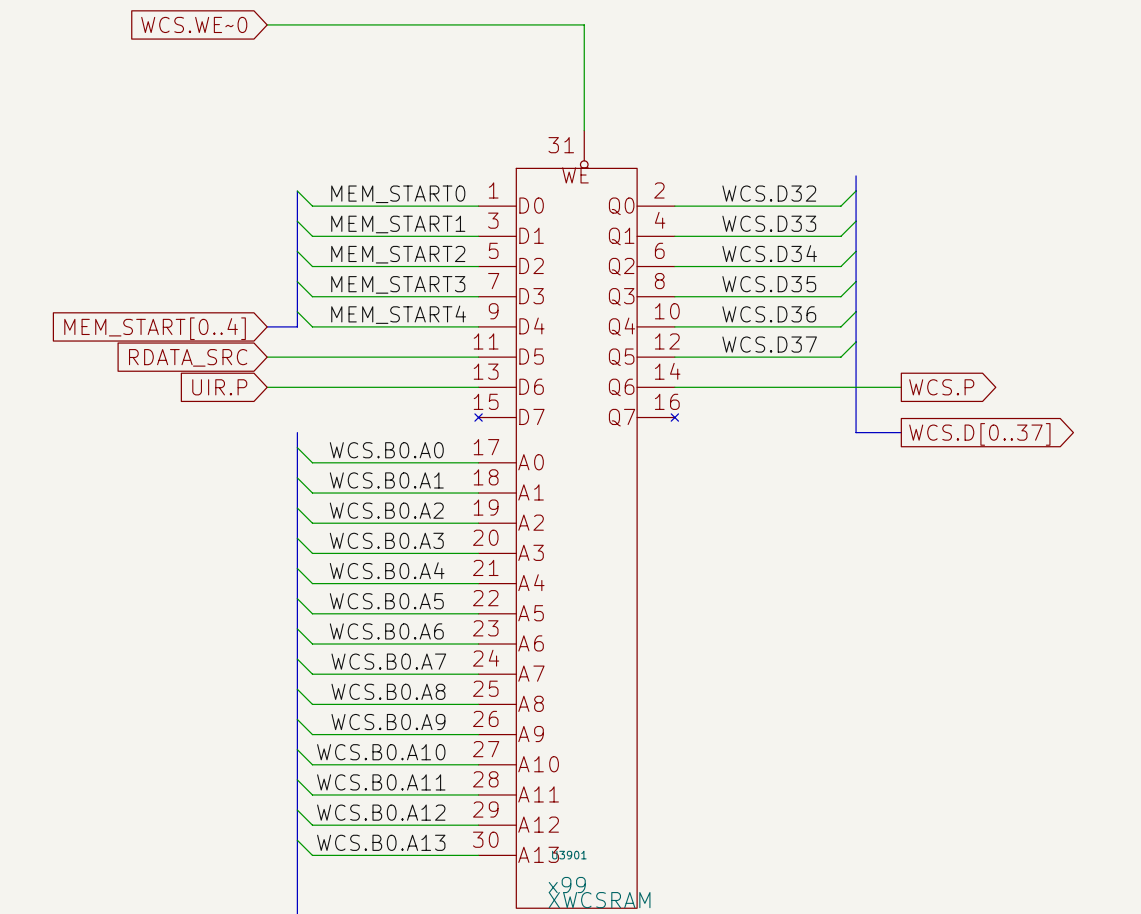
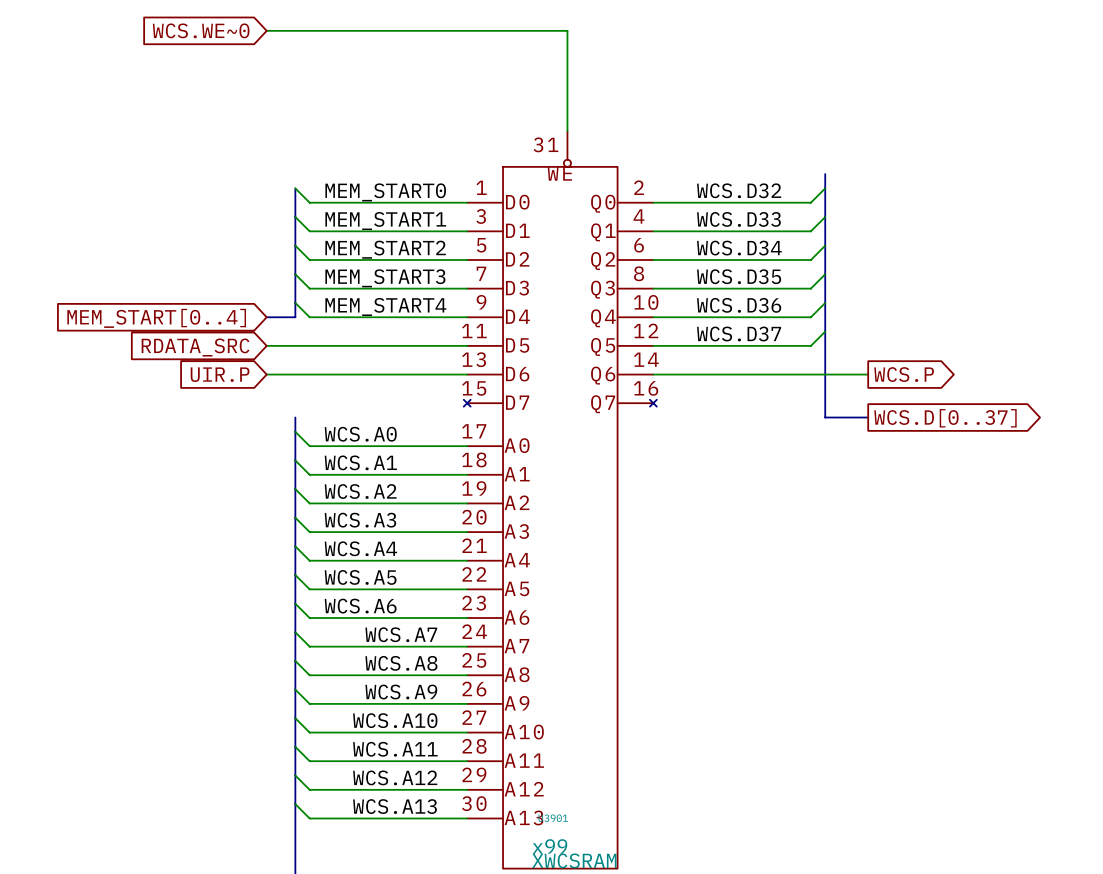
label: WCS.B0.A0 (386, 450) -> WCS.A0 (360, 434)
label: WCS.B0.A1 (386, 480) -> WCS.A1 (360, 462)
label: WCS.B0.A2 (386, 510) -> WCS.A2 (360, 491)
label: WCS.B0.A3 (386, 540) -> WCS.A3 (360, 520)
label: WCS.B0.A4 (387, 570) -> WCS.A4 (360, 548)
label: WCS.B0.A5 (386, 601) -> WCS.A5 (360, 577)
label: WCS.B0.A6 (386, 631) -> WCS.A6 (360, 606)
label: WCS.B0.A7 (388, 661) -> WCS.A7 (401, 634)
label: WCS.B0.A8 (388, 691) -> WCS.A8 (401, 663)
label: WCS.B0.A9 (388, 722) -> WCS.A9 (401, 692)
label: WCS.B0.A10 (381, 752) -> WCS.A10 (395, 720)
label: WCS.B0.A11 (381, 782) -> WCS.A11 (395, 749)
label: WCS.B0.A12 (381, 812) -> WCS.A12 (395, 777)
label: WCS.B0.A13 (381, 842) -> WCS.A13 (395, 806)

